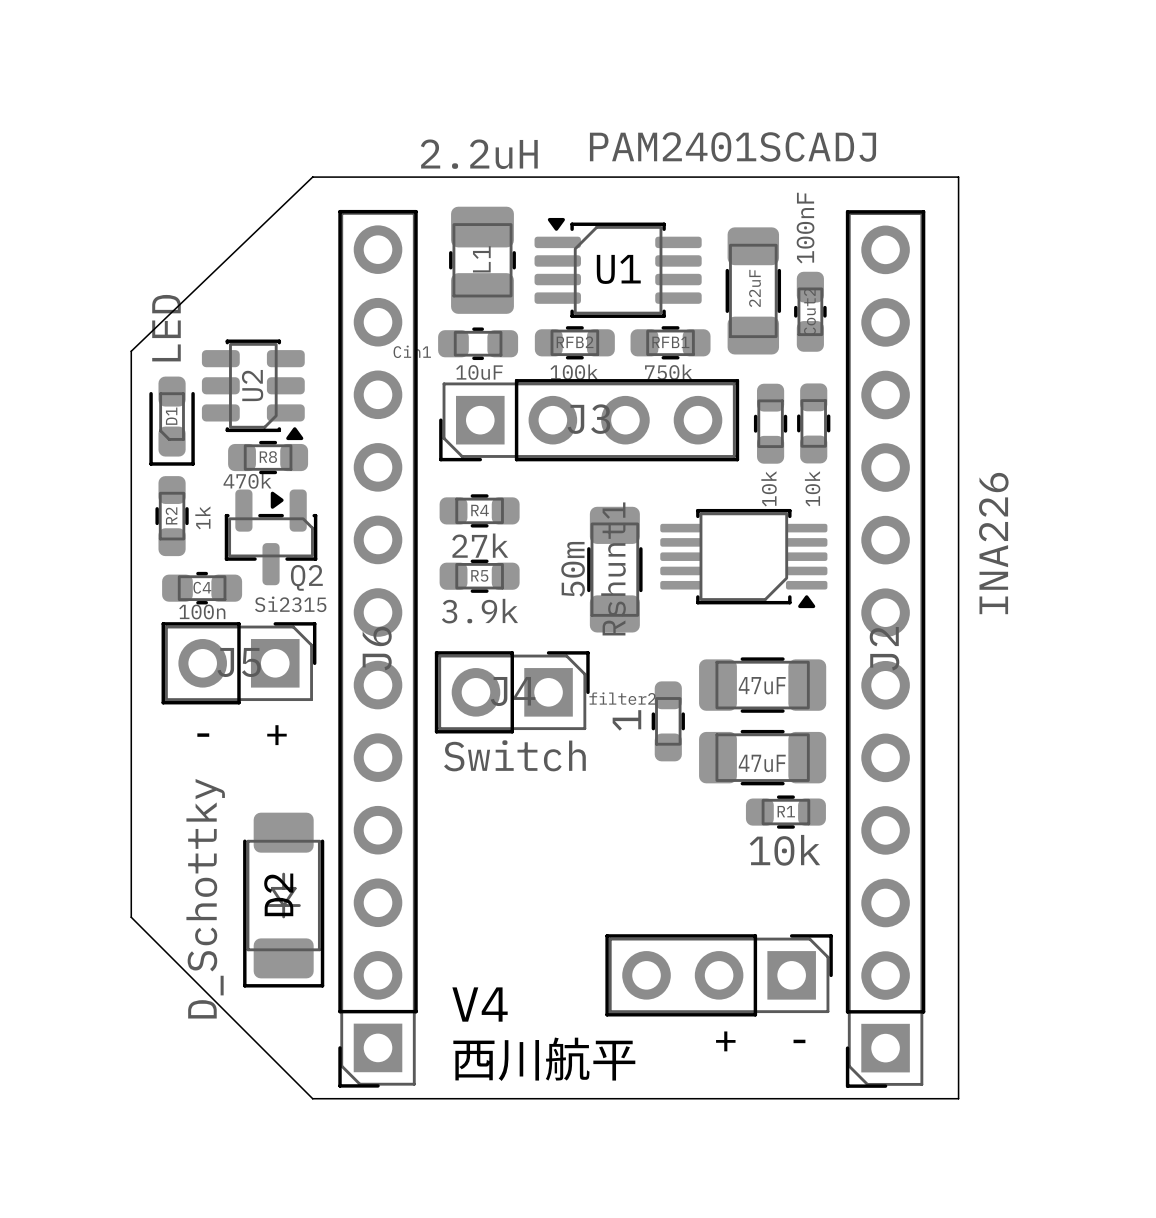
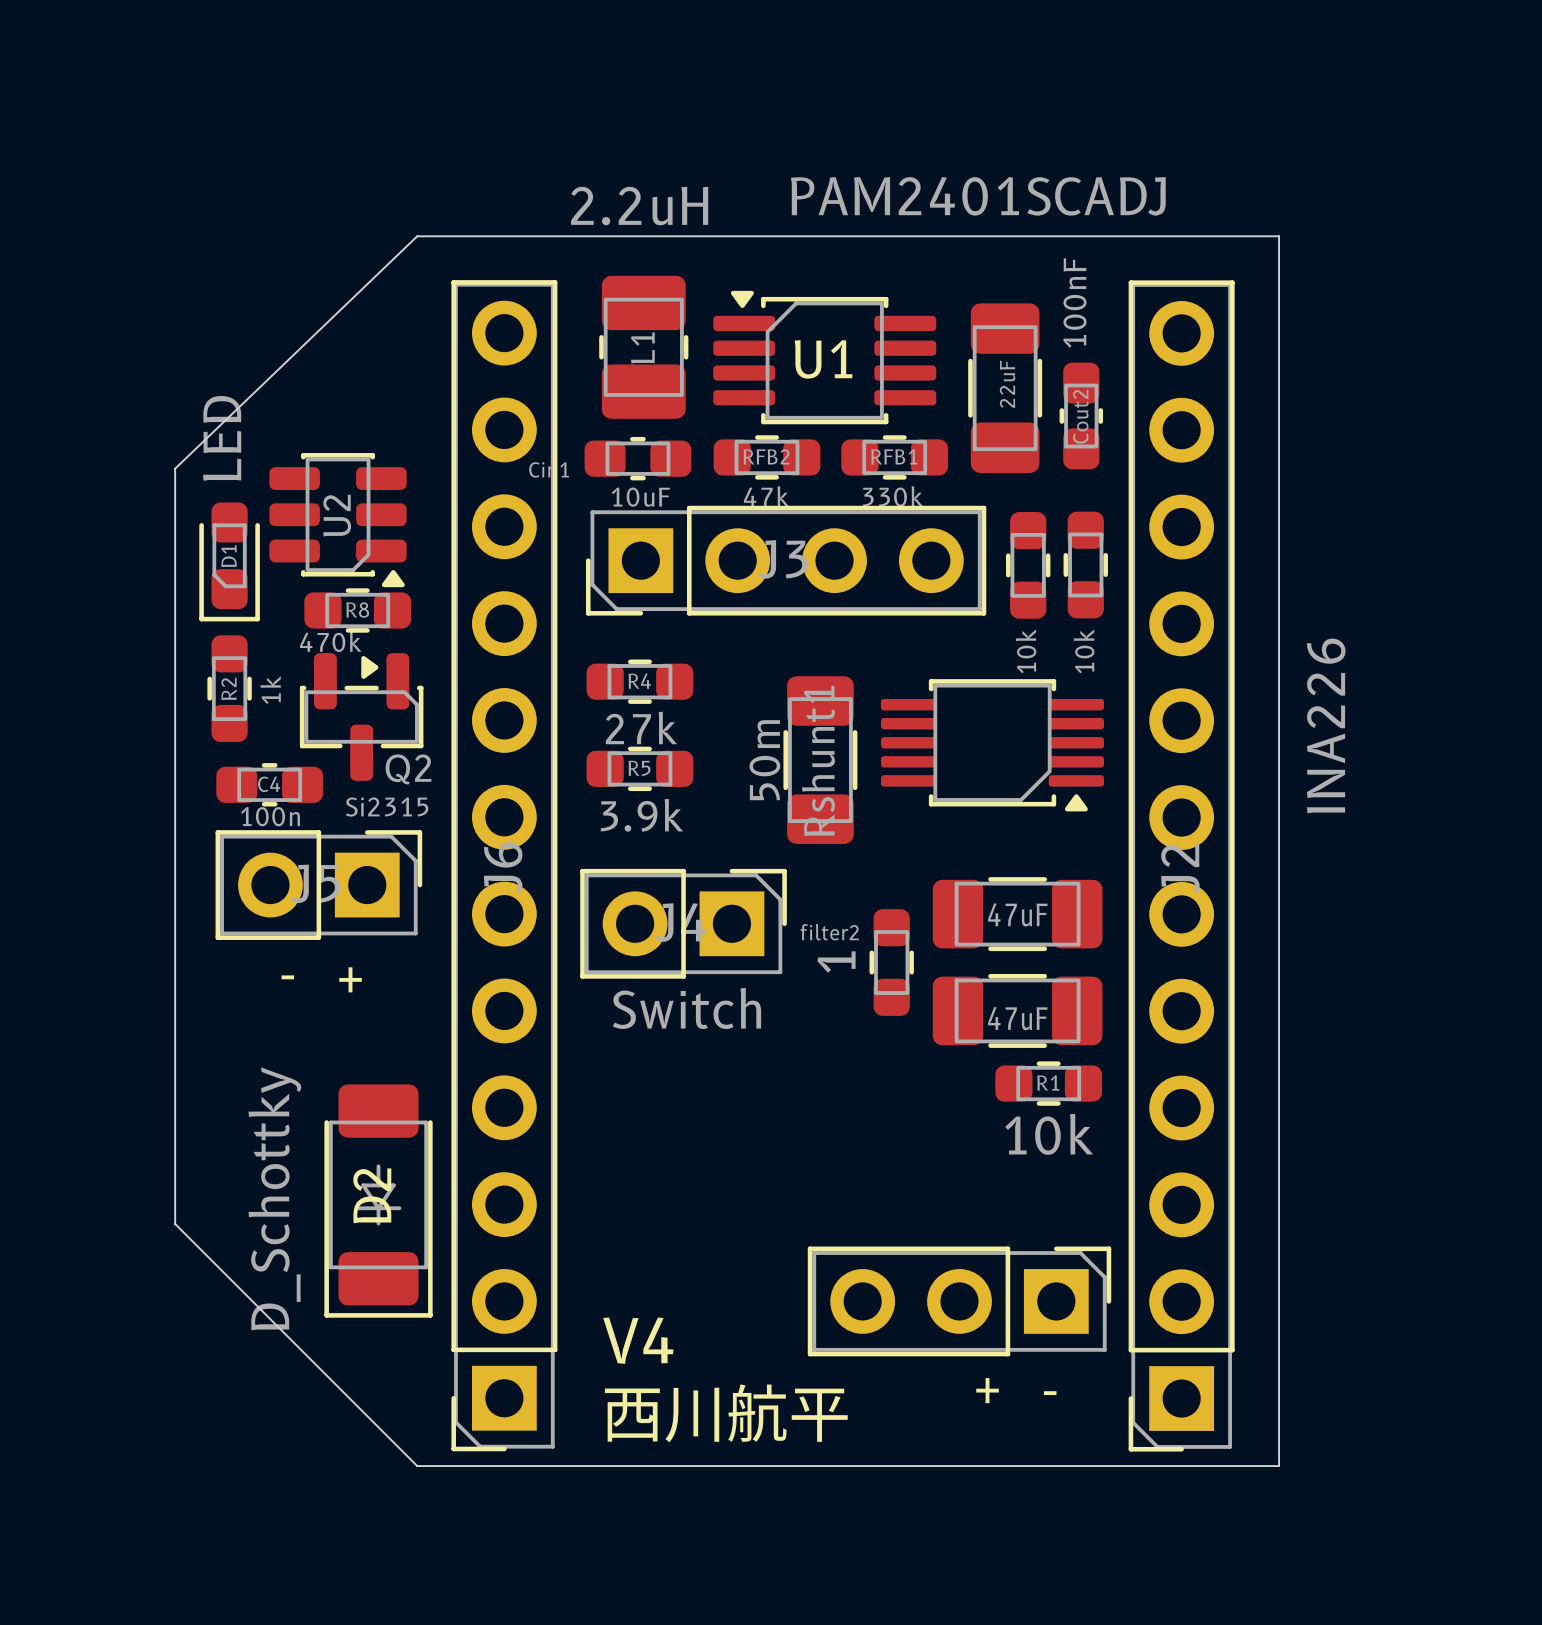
RFB2 value: 100k (574, 372) -> 47k (766, 496)
RFB1 value: 750k (668, 372) -> 330k (892, 496)

